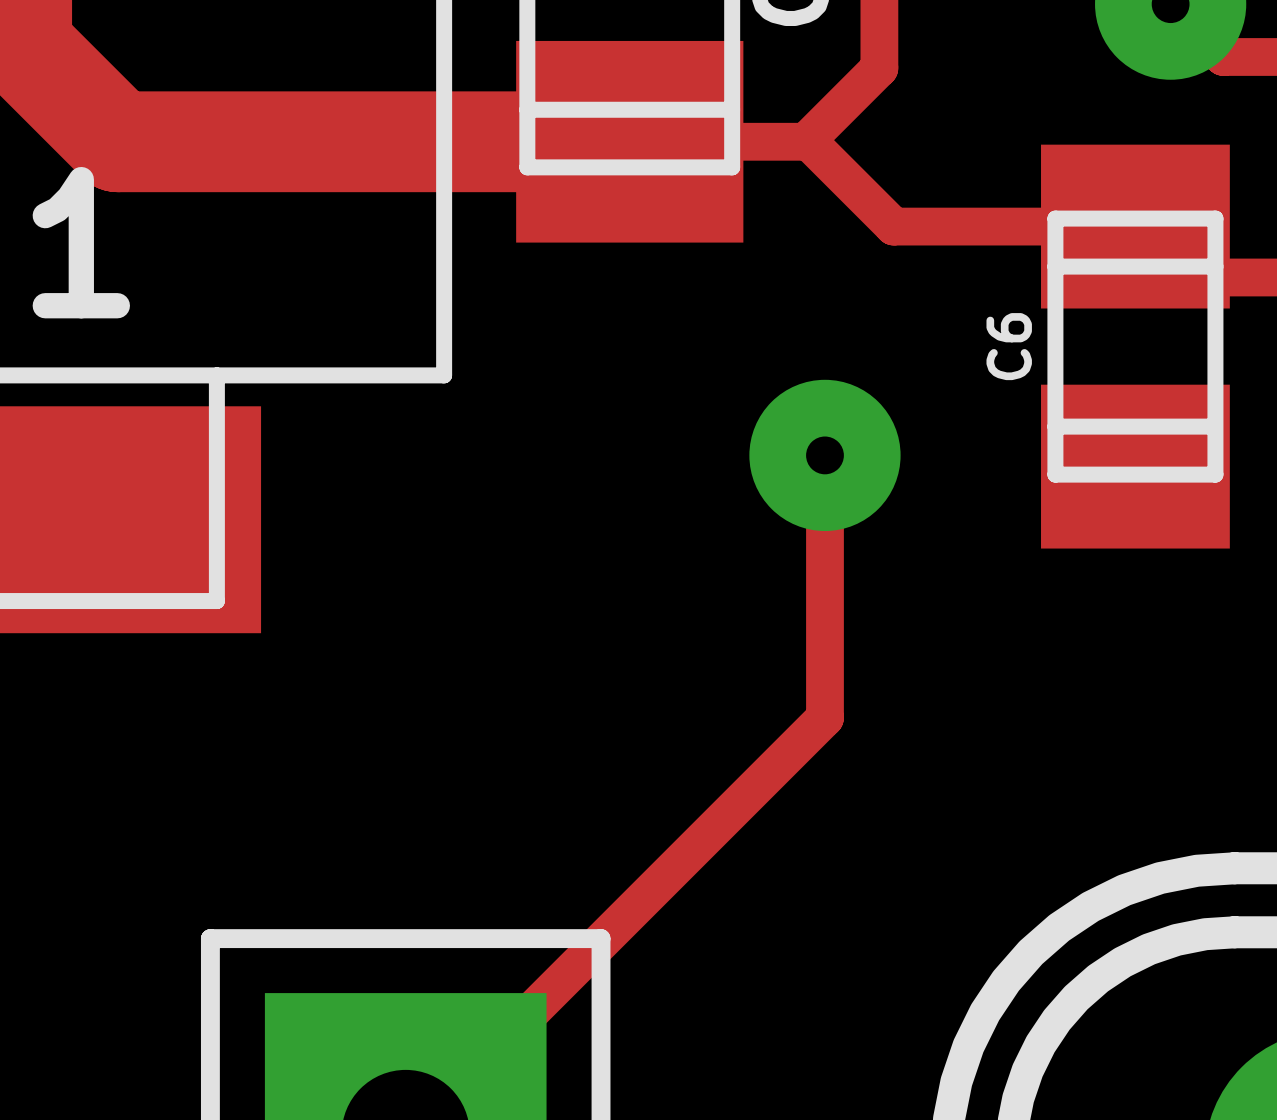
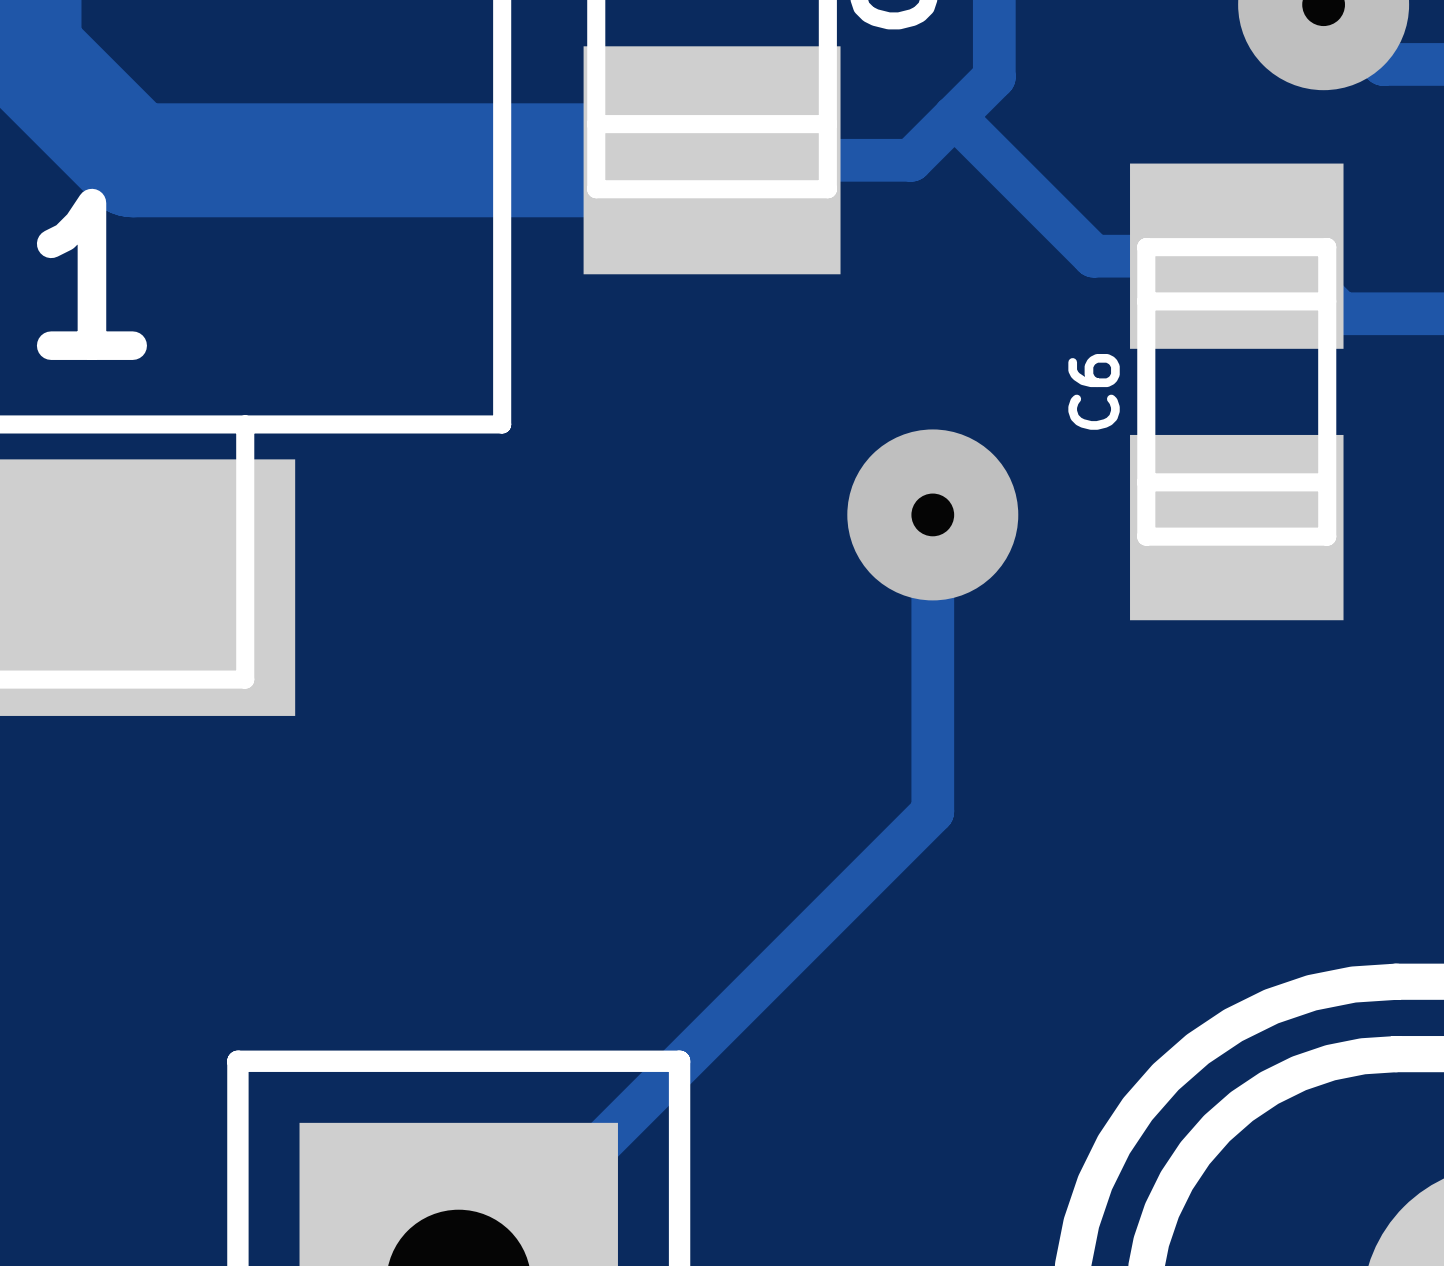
track: (805, 141) (808, 141) (893, 226) (967, 226) -> (954, 116) (1093, 256)
C6 position: (1135, 346) -> (1236, 391)

